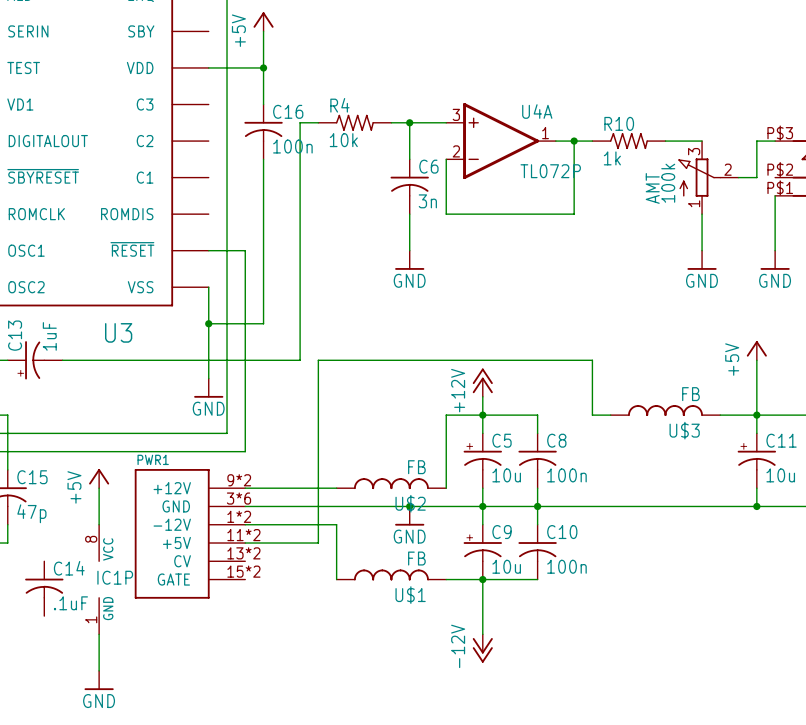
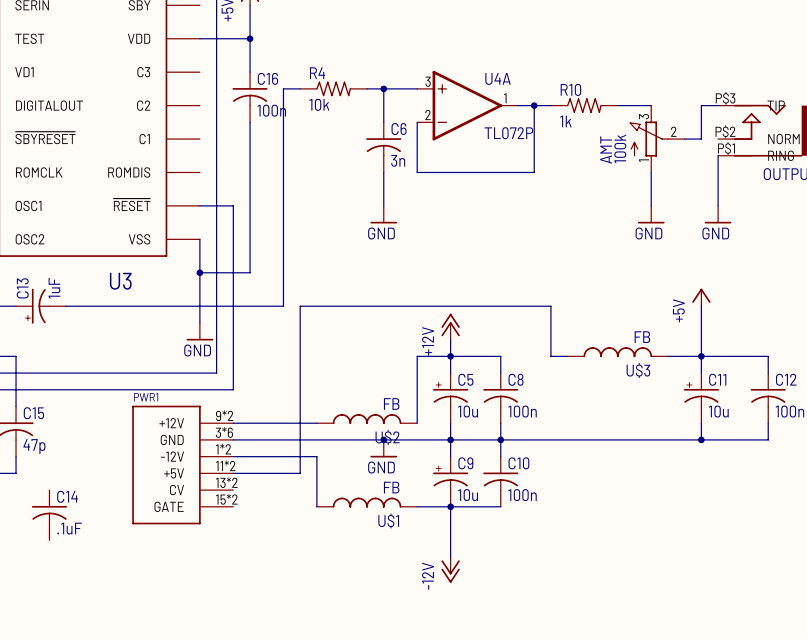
power symbol: +5V (99, 478) -> none
wire: (99, 488) (99, 524) -> none
IC1P: (99, 579) -> none
wire: (99, 634) (99, 670) -> none
power symbol: GND (99, 680) -> none

